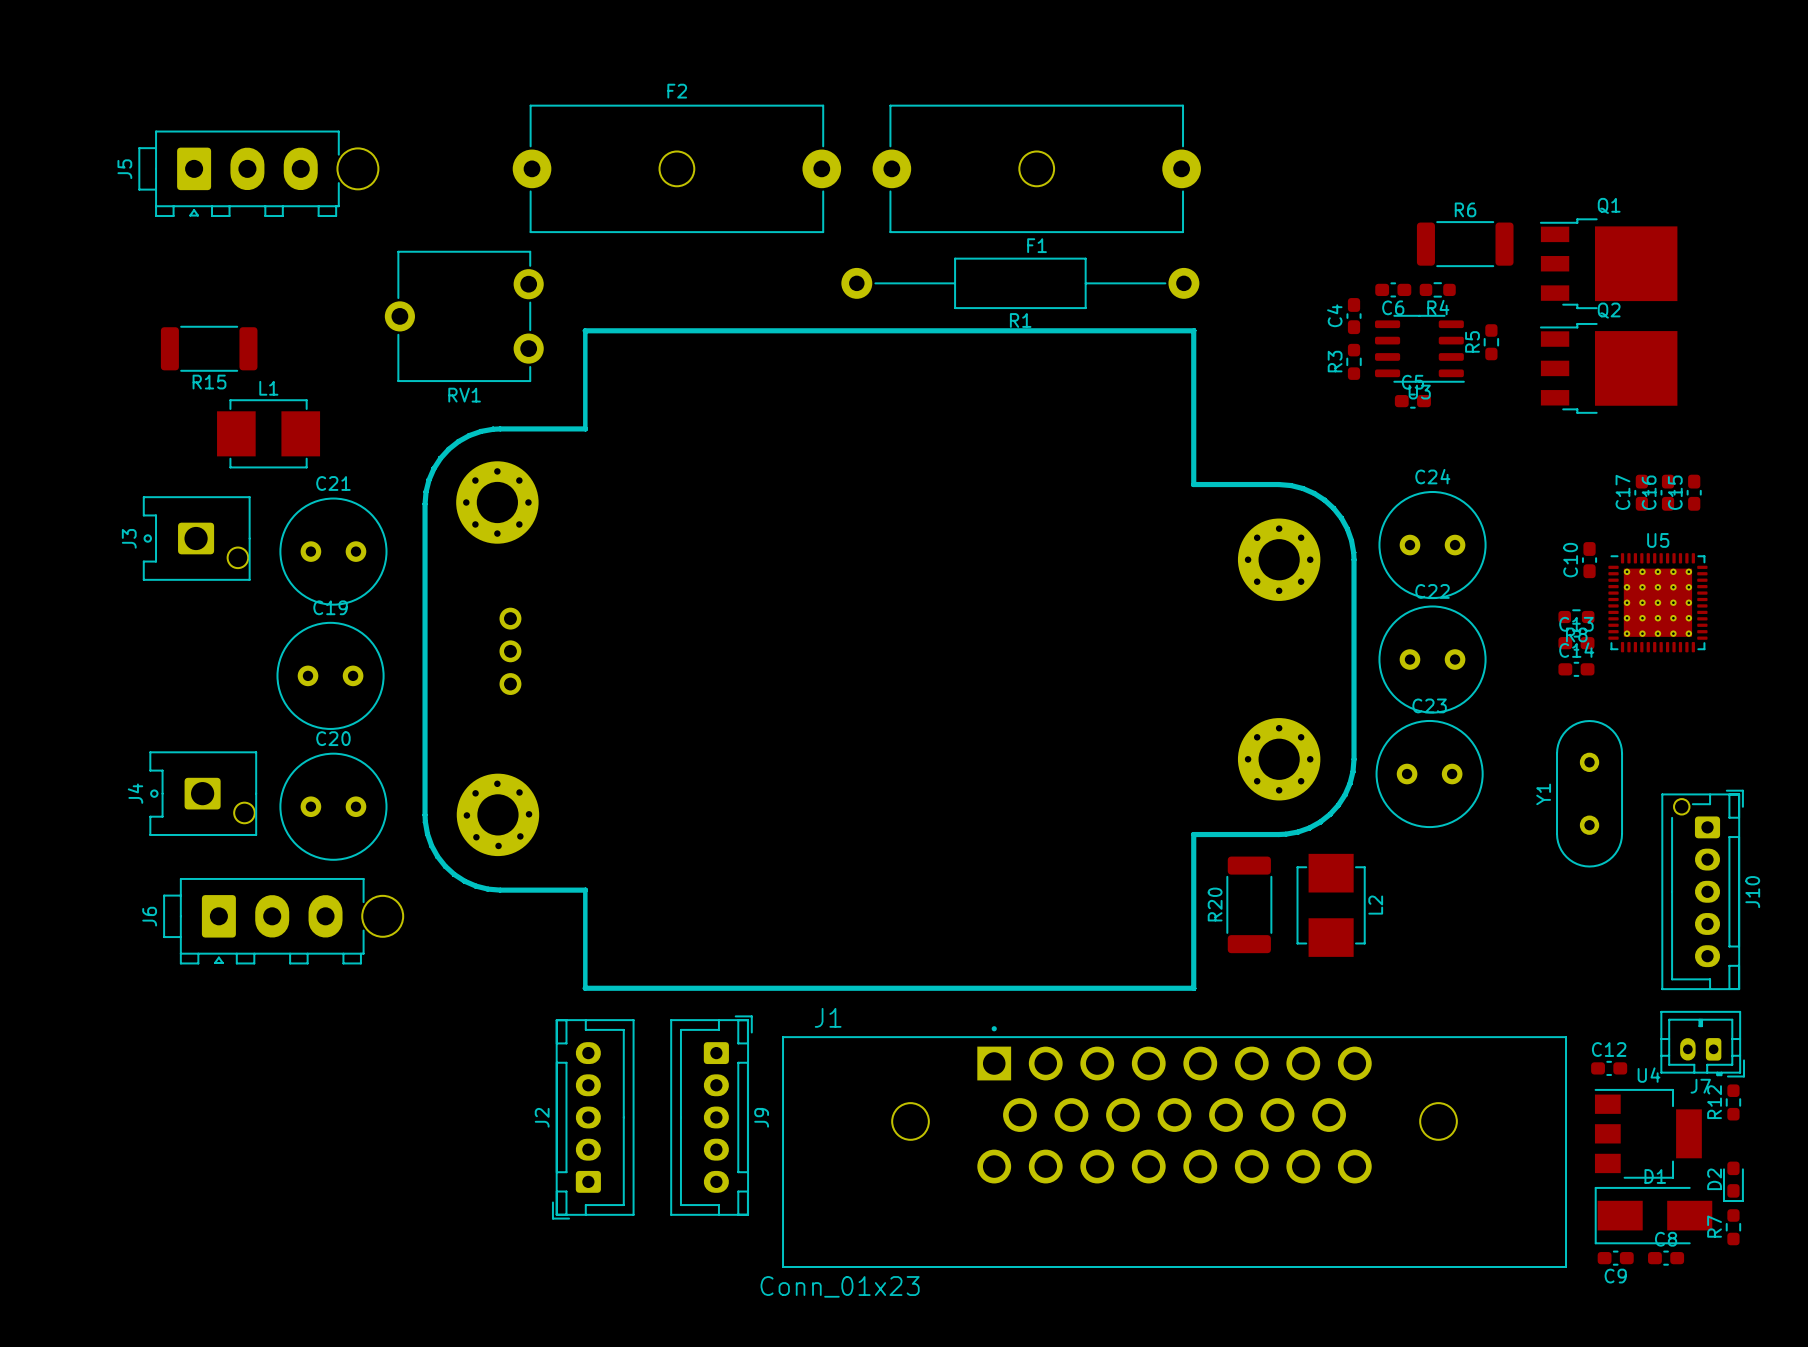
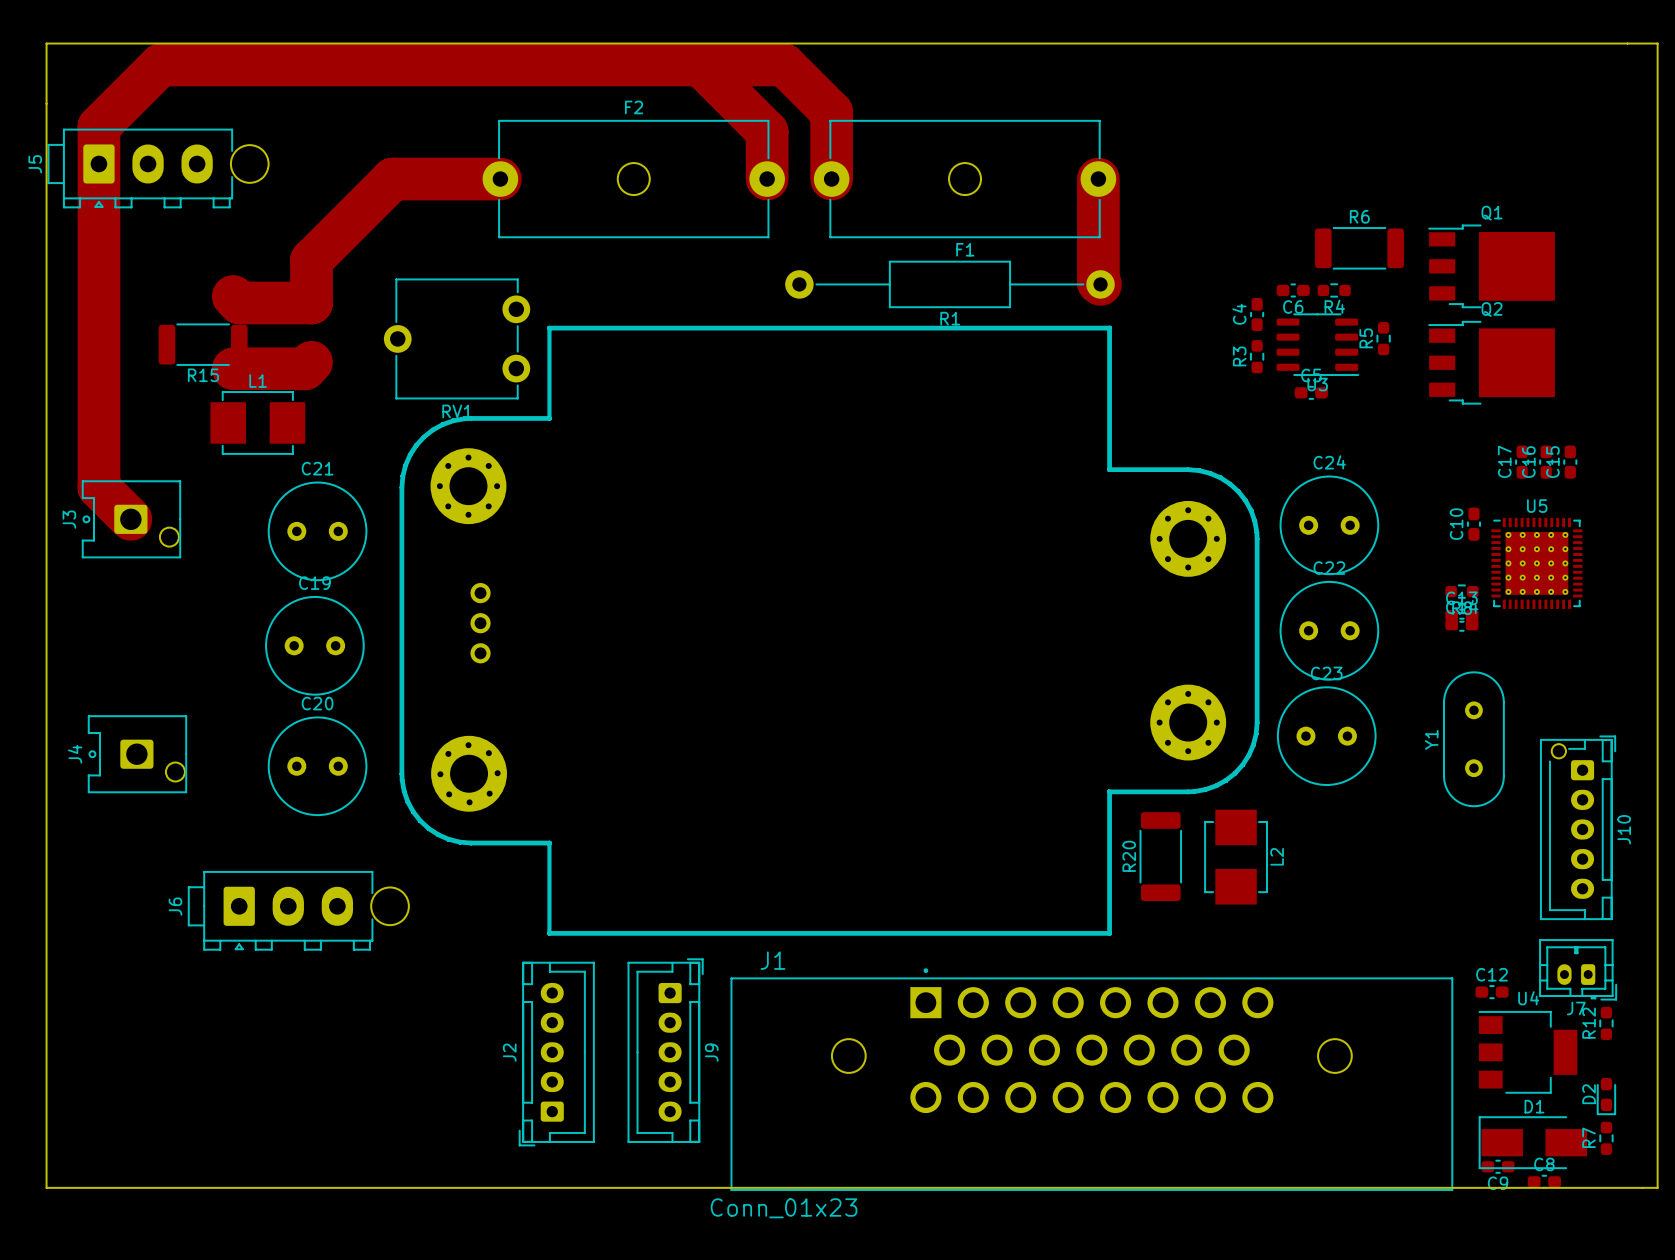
board edge: none -> (46, 43) (1657, 43) (1657, 1187) (46, 1187) (46, 43)
track: none -> (700, 64) (767, 131) (767, 179)
track: none -> (500, 179) (392, 179) (311, 260) (311, 302) (239, 302) (233, 296)
track: none -> (831, 179) (831, 112) (784, 64) (160, 64) (98, 126) (98, 487) (130, 519)
track: none -> (1098, 179) (1098, 282) (1100, 284)
J5 position: (258, 173) -> (158, 168)
RV1 position: (464, 316) -> (457, 338)
track: none -> (311, 362) (305, 368) (233, 368)
C17 position: (1641, 492) -> (1522, 462)
C16 position: (1668, 492) -> (1546, 462)
C15 position: (1694, 492) -> (1570, 462)
J3 position: (196, 538) -> (131, 519)
C10 position: (1589, 560) -> (1473, 524)
U5 position: (1657, 602) -> (1536, 563)
C14 position: (1576, 669) -> (1461, 624)
J4 position: (203, 793) -> (137, 754)
Y1 position: (1589, 793) -> (1473, 739)
J10 position: (1702, 889) -> (1578, 827)
J6 position: (283, 921) -> (298, 910)
J7 position: (1702, 1044) -> (1578, 969)
C12 position: (1609, 1068) -> (1492, 992)
R12 position: (1733, 1102) -> (1606, 1023)
U4 position: (1648, 1133) -> (1528, 1052)
D2 position: (1733, 1181) -> (1606, 1096)
R7 position: (1733, 1227) -> (1606, 1138)
C9 position: (1615, 1258) -> (1498, 1166)

